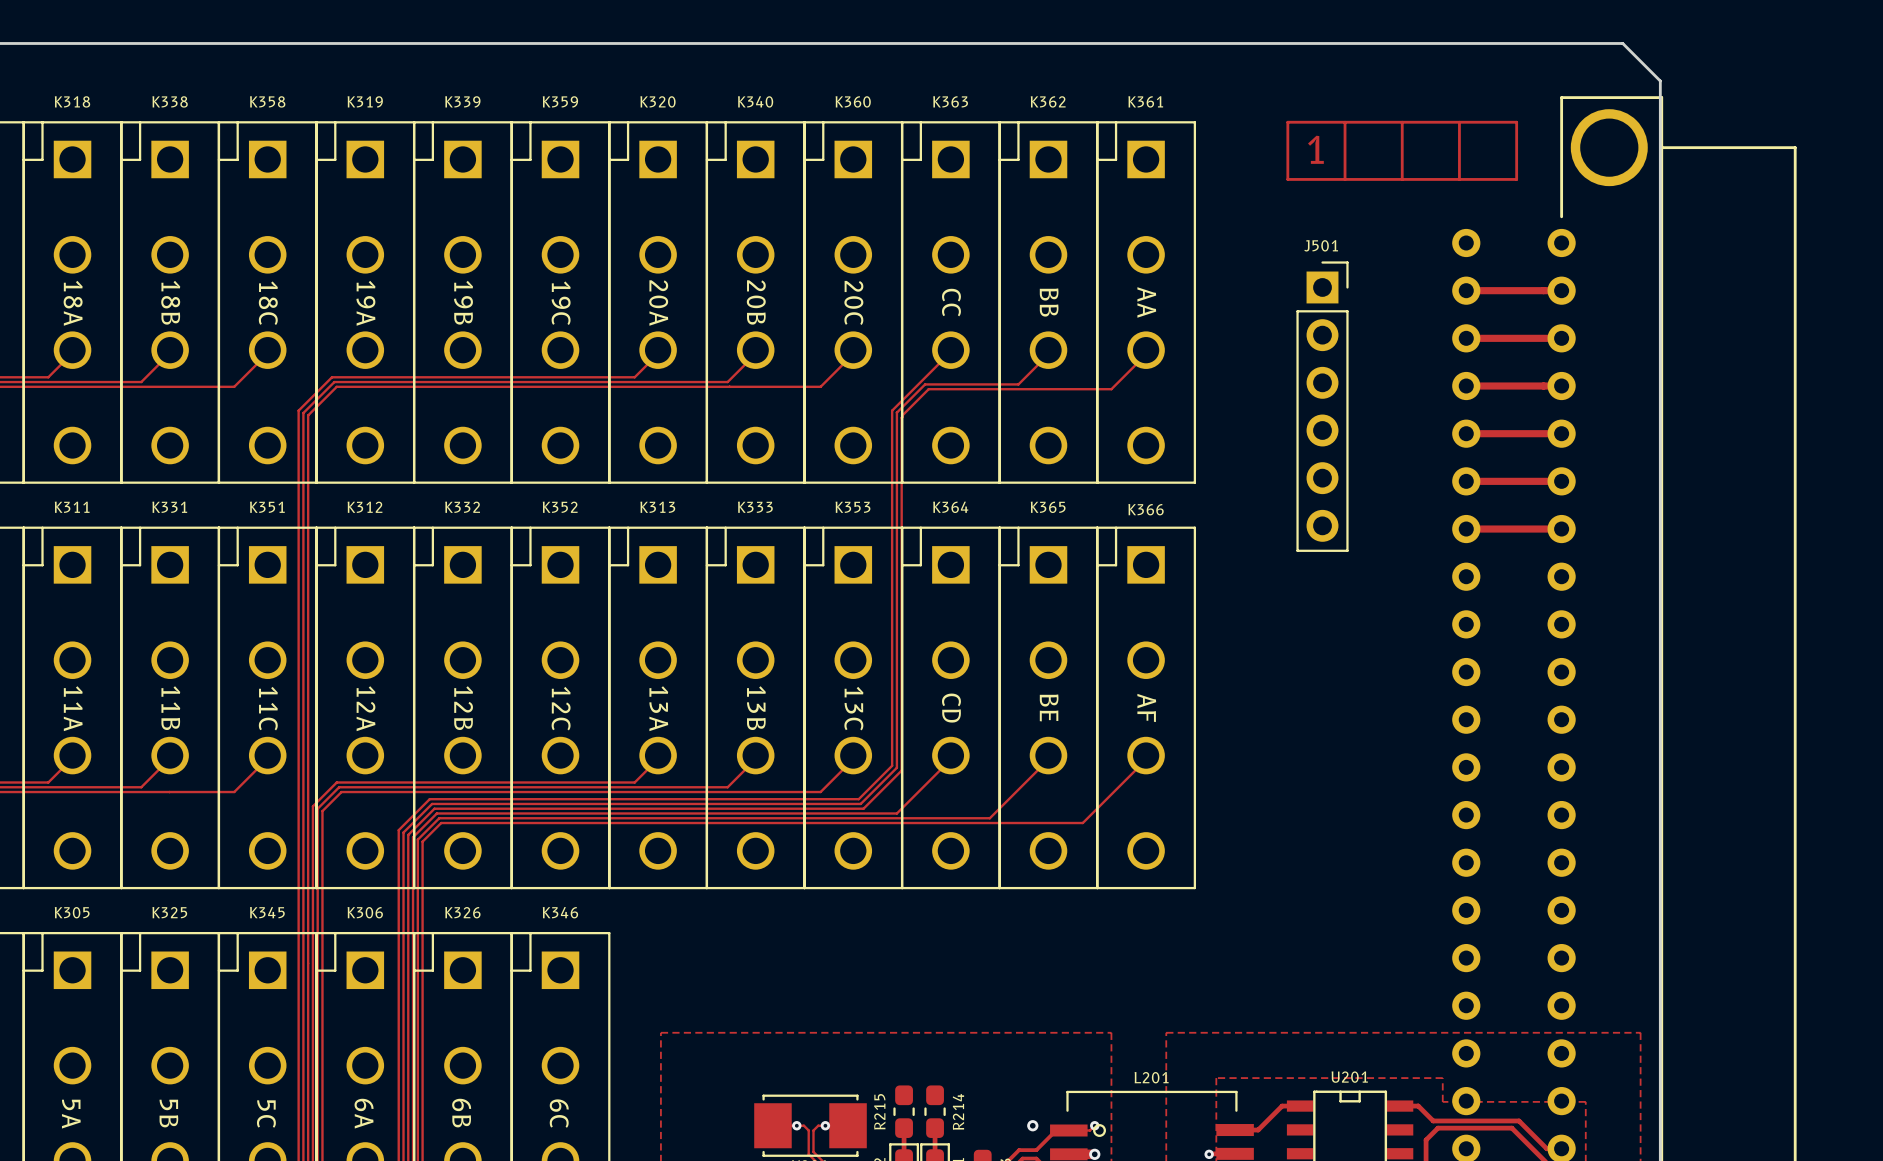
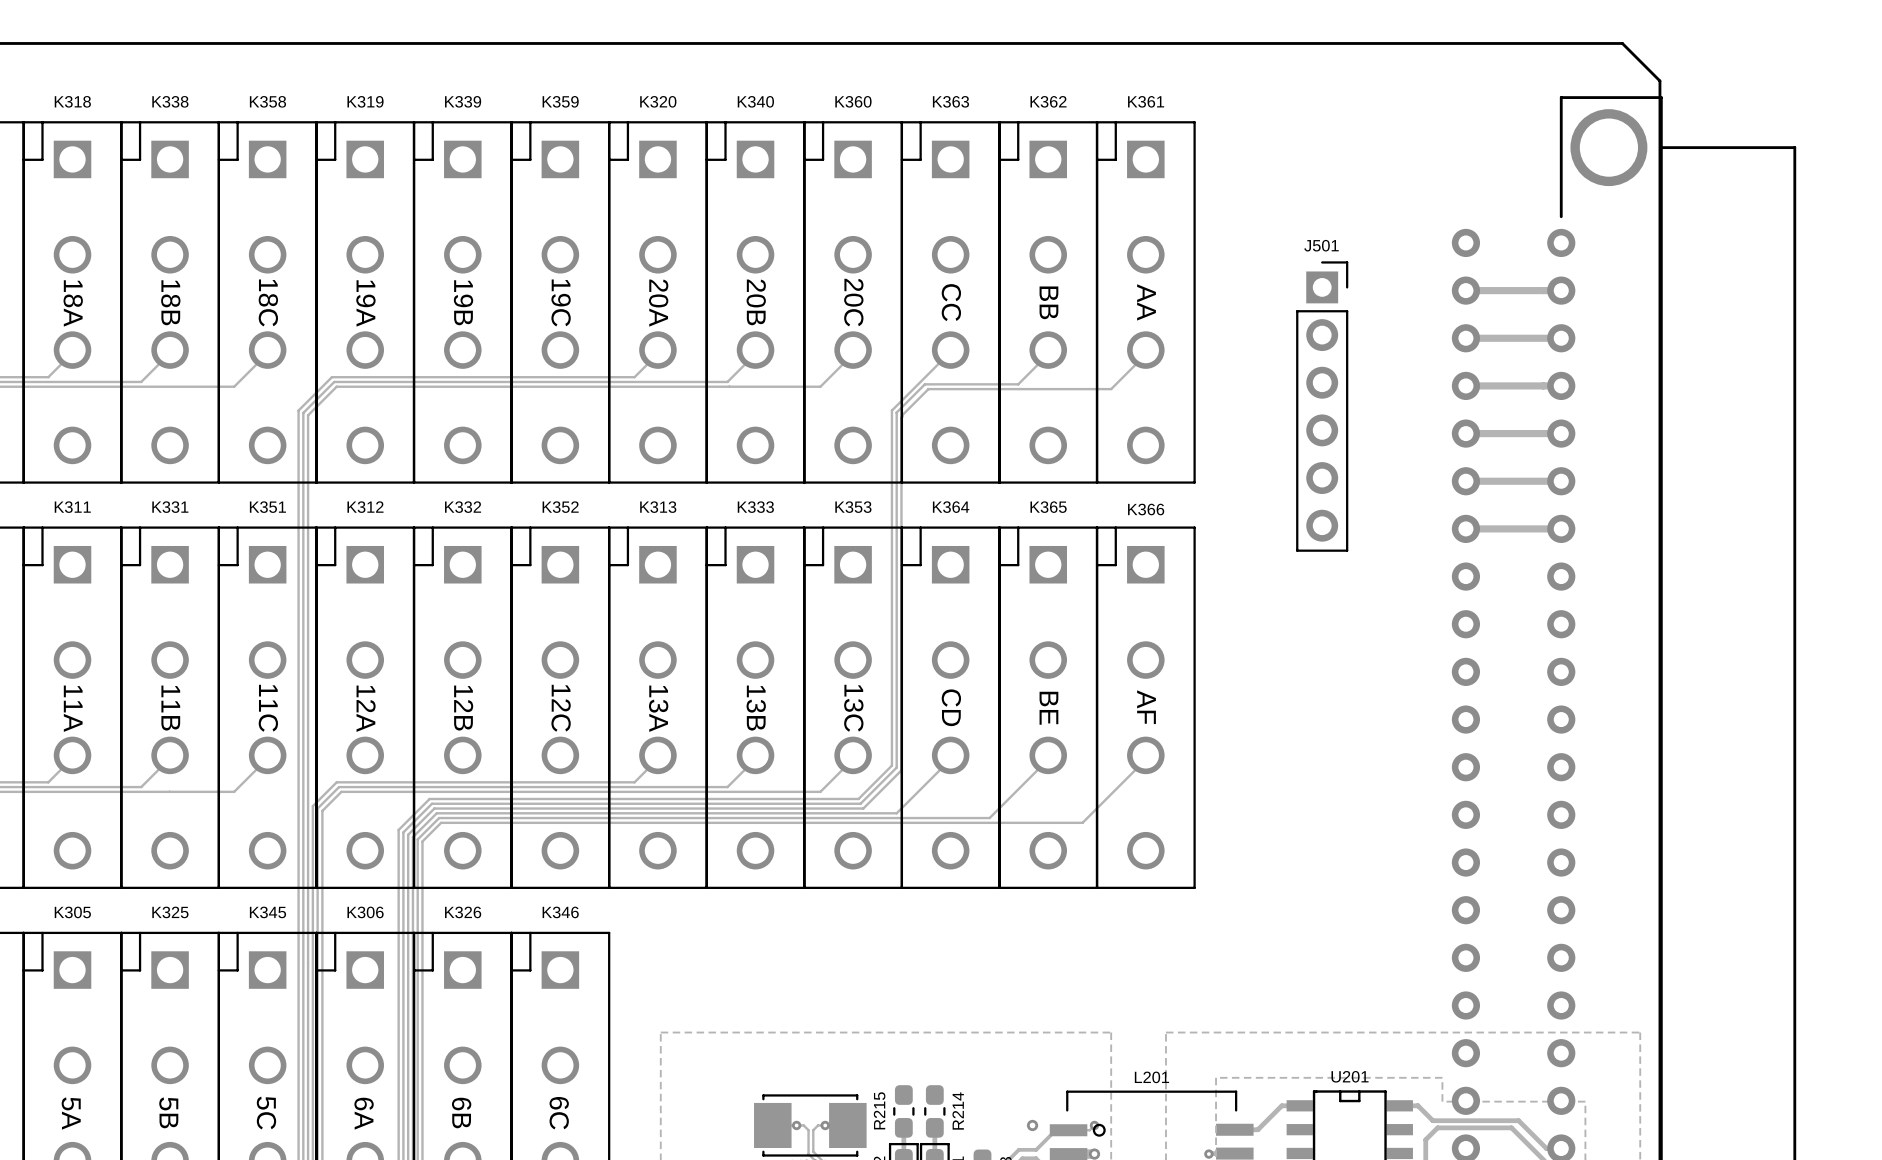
track: (1287, 122) (1287, 179) (1516, 179) (1516, 122) (1287, 122) -> none
track: (1345, 122) (1345, 179) -> none
track: (1402, 122) (1402, 179) -> none
track: (1459, 122) (1459, 179) -> none
text: 1 (1315, 149) -> none

